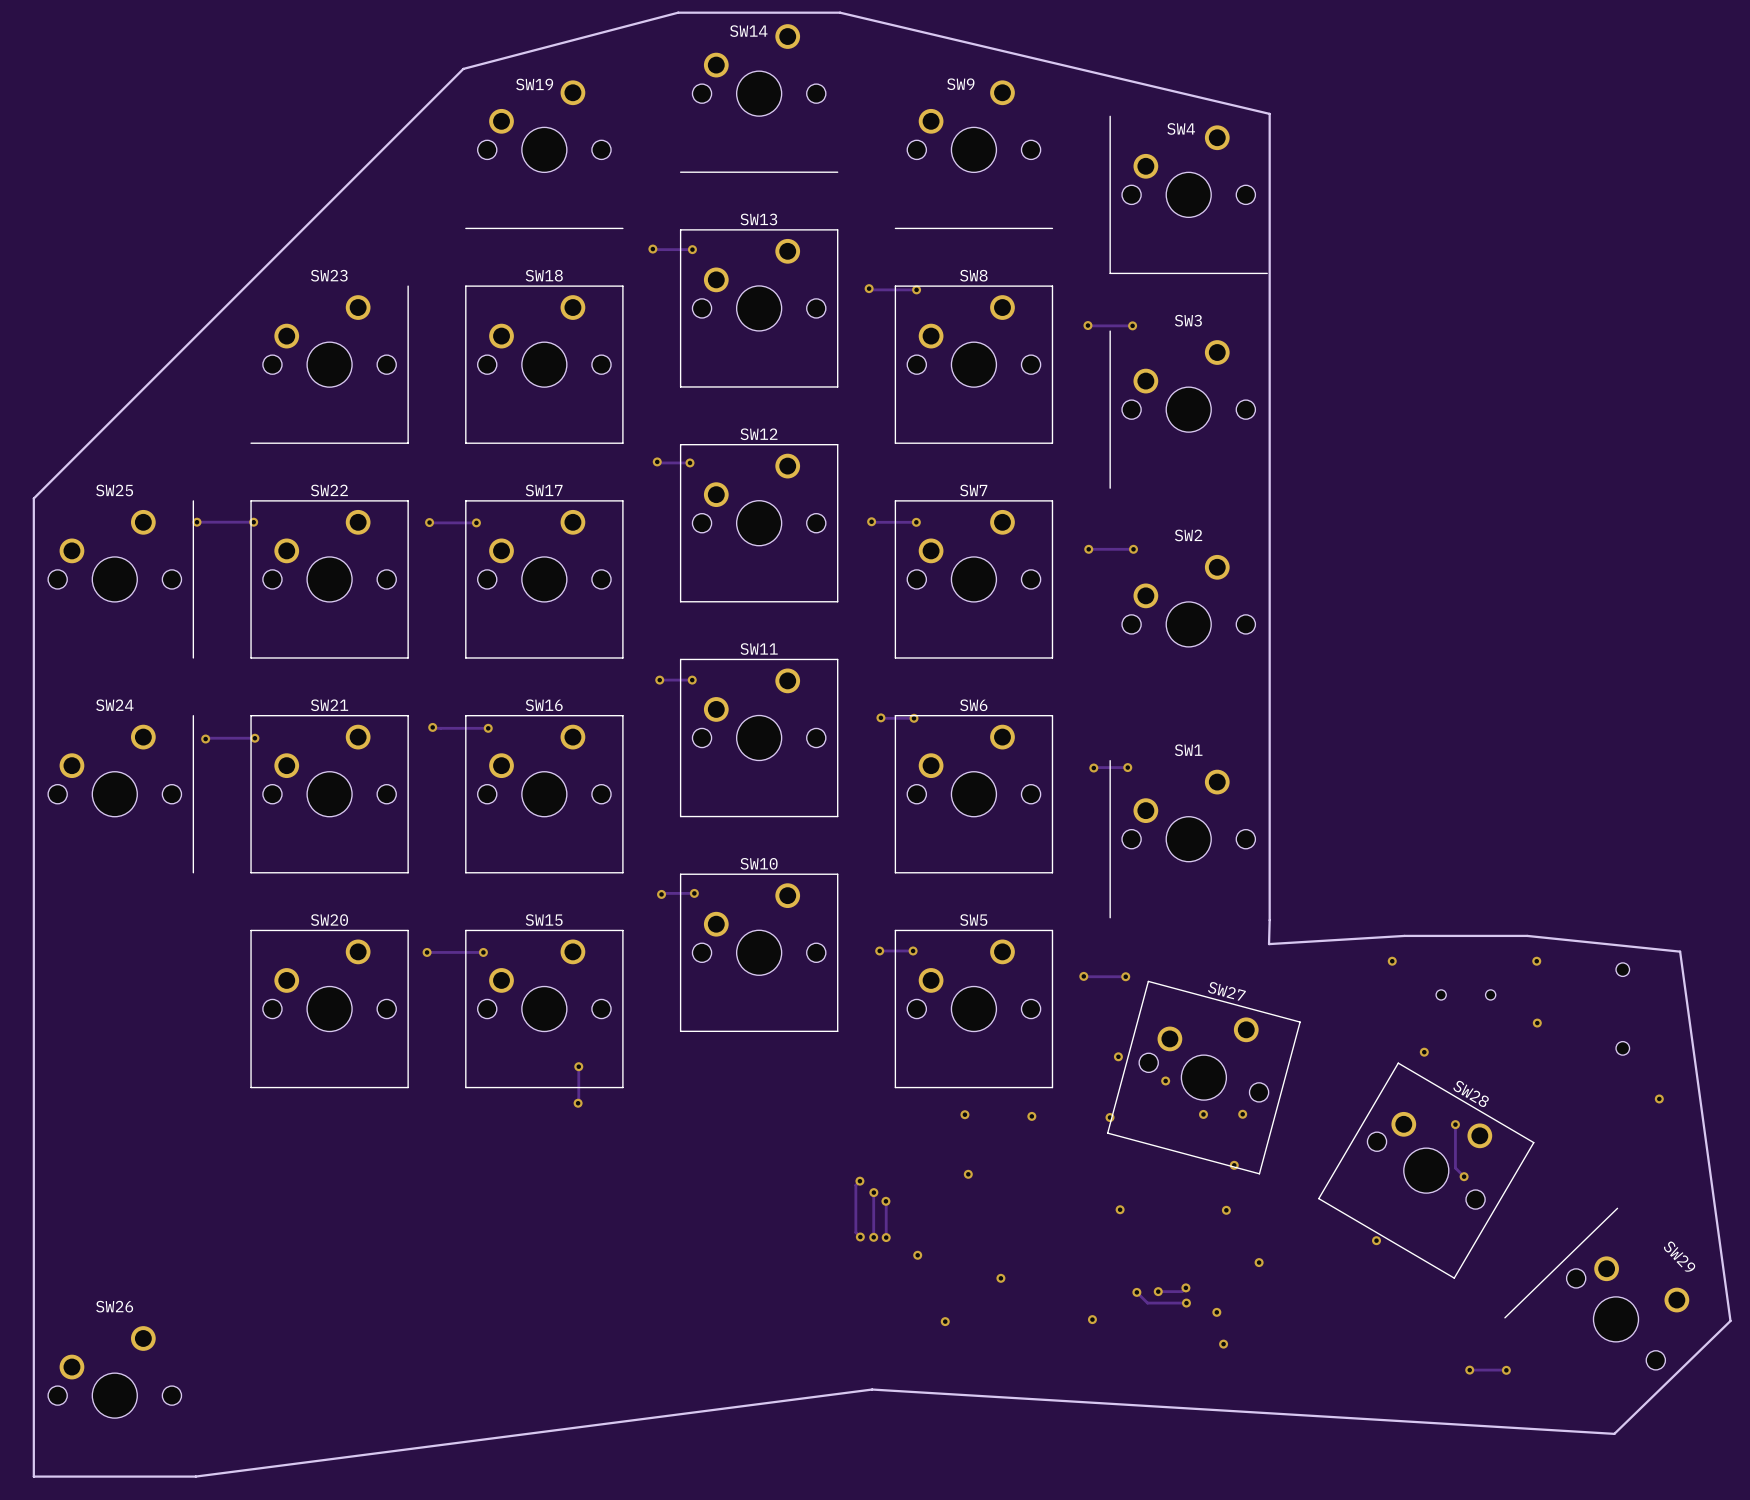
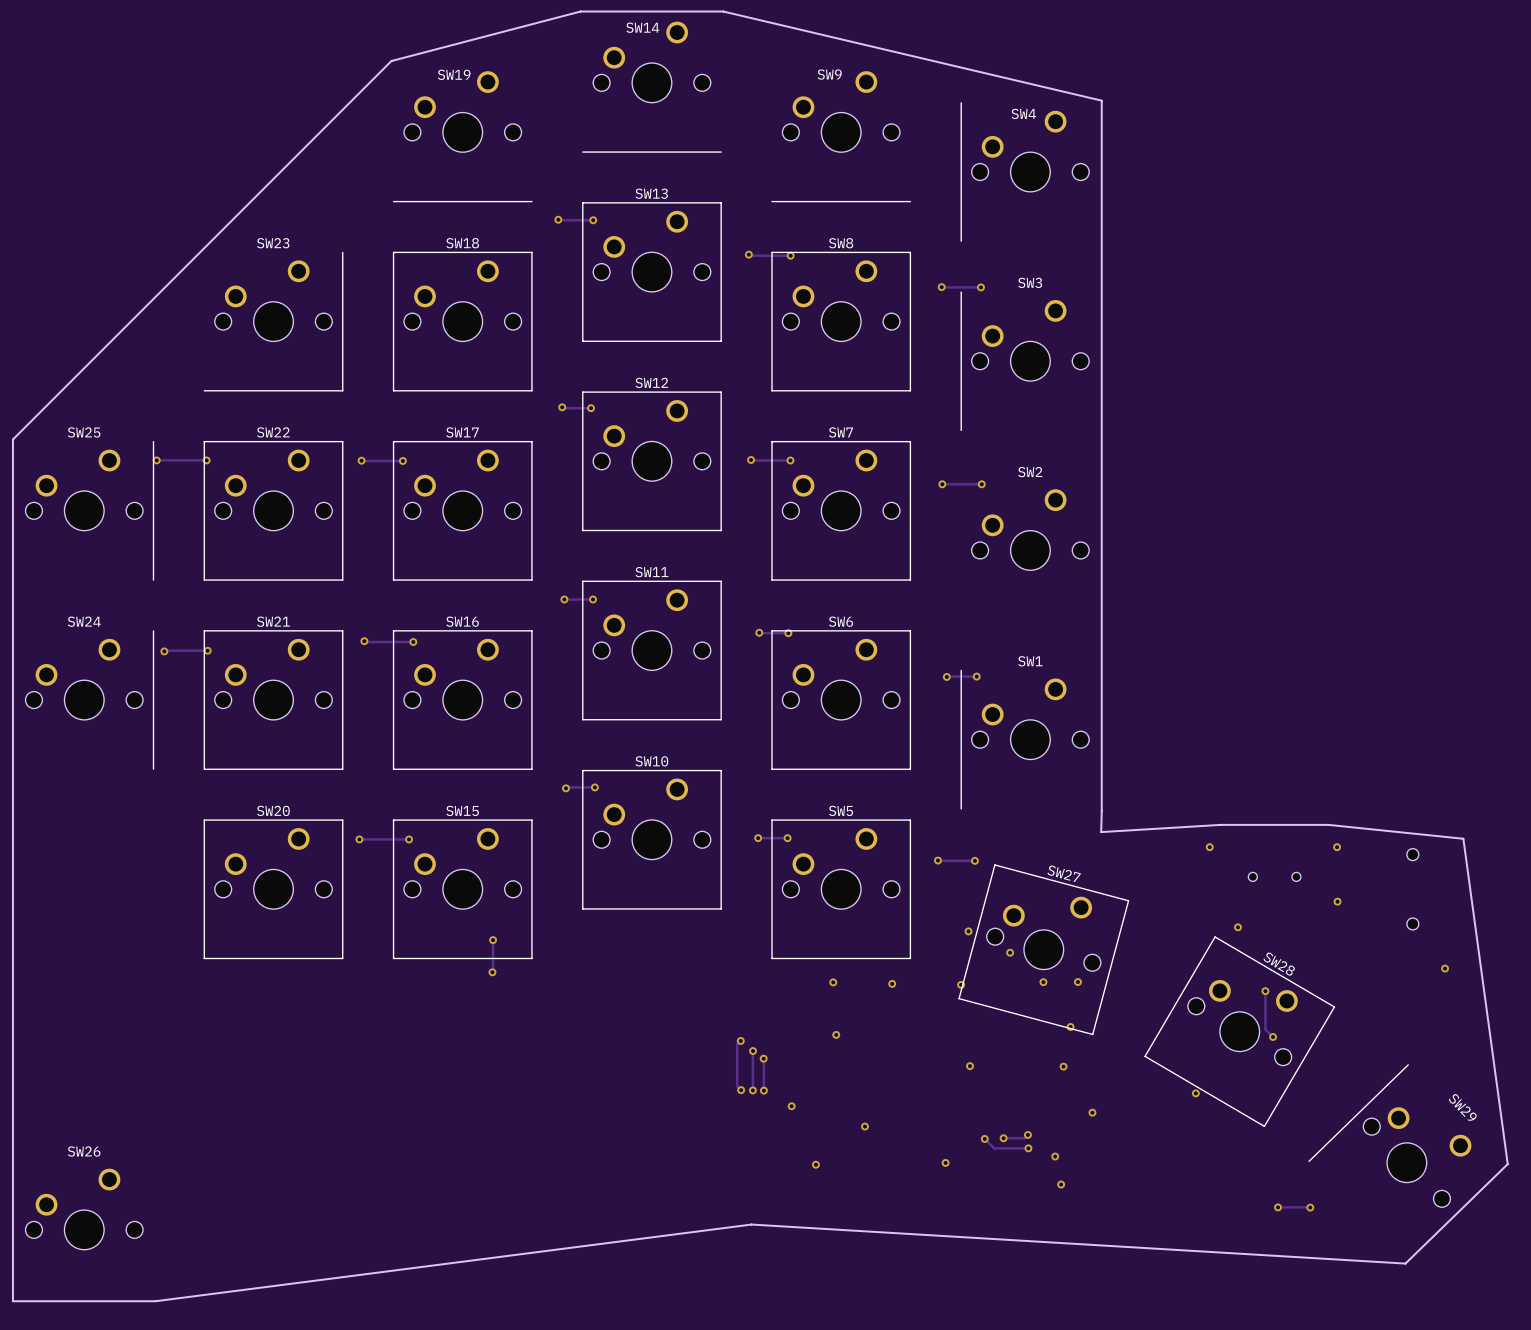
SW4 footprint: [1109, 115, 1268, 275] -> [960, 102, 1090, 242]

